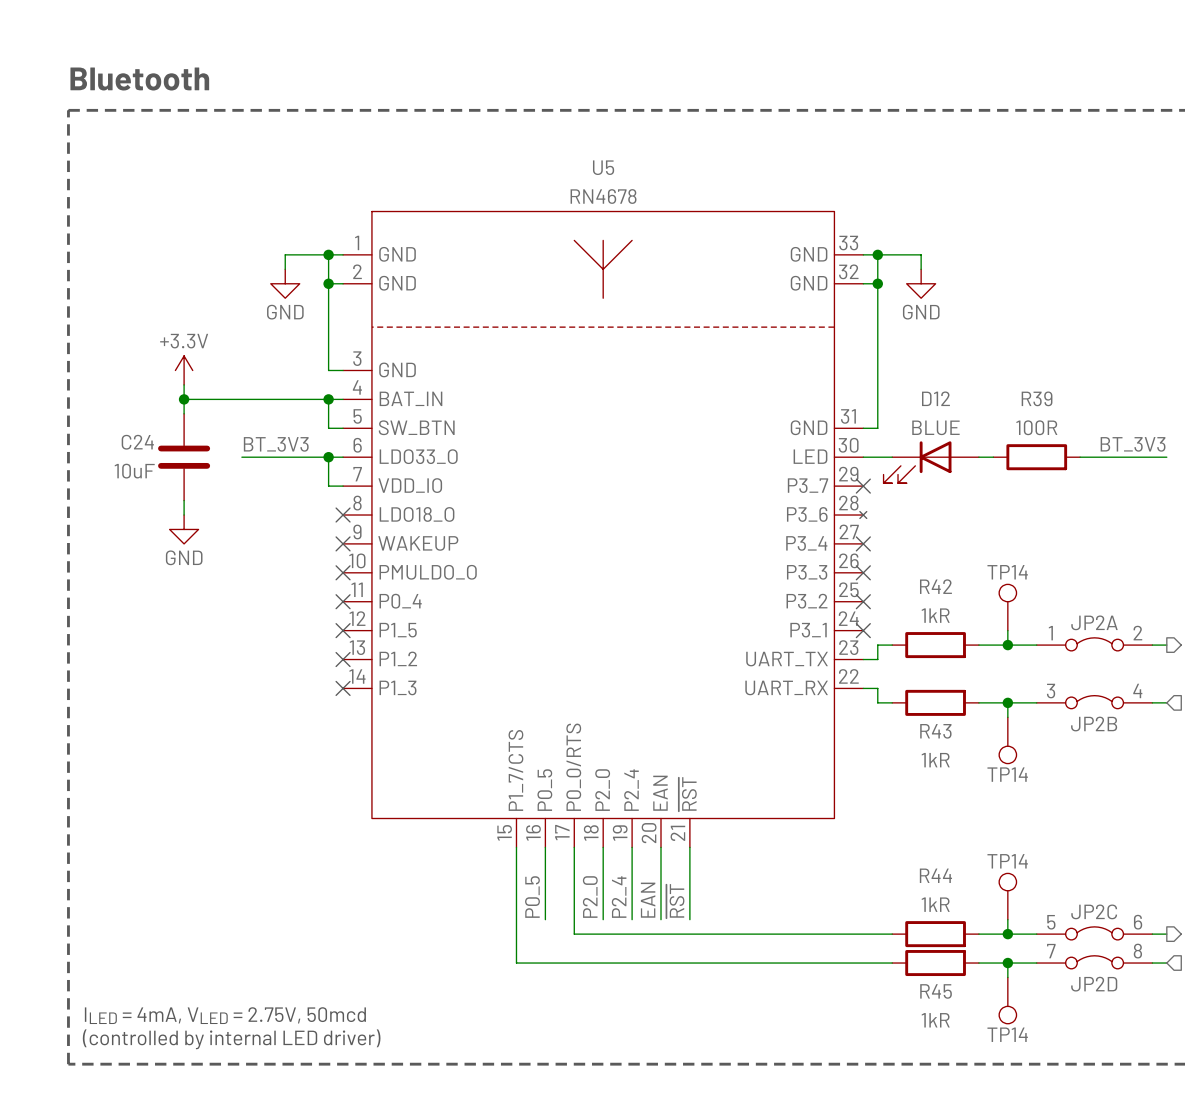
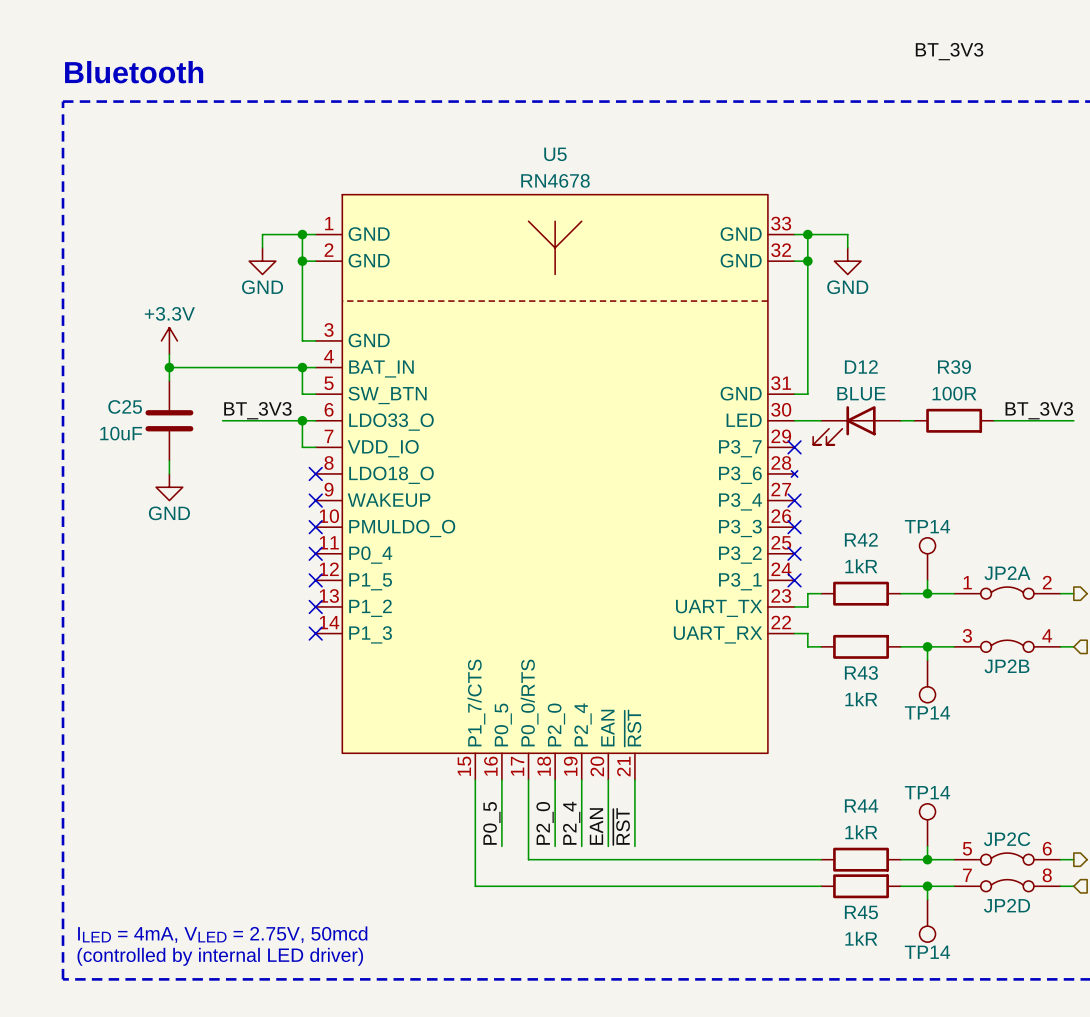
label: none -> BT_3V3 (949, 51)
C24 name: C24 (137, 442) -> C25 (125, 406)

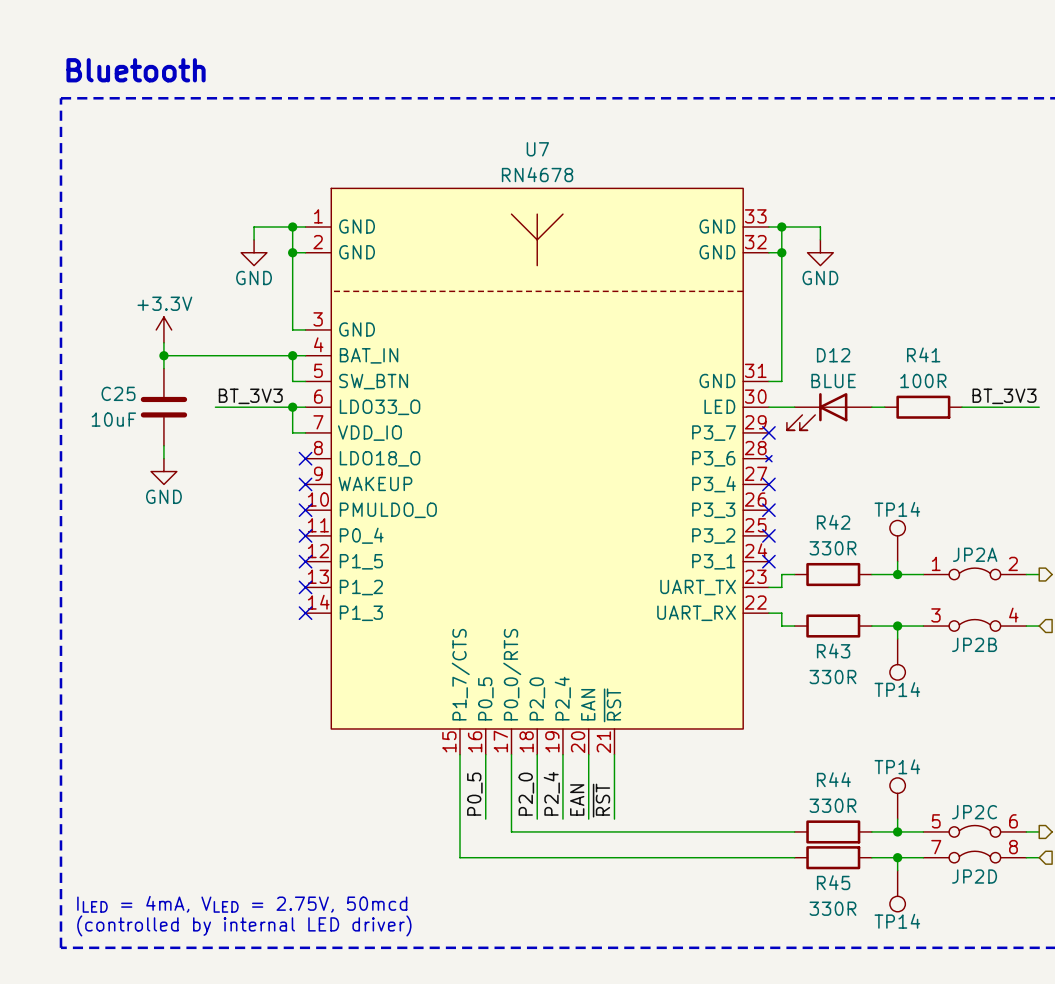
label: BT_3V3 (949, 51) -> none
U5 name: U5 (555, 154) -> U7 (537, 149)
R39 name: R39 (954, 367) -> R41 (923, 354)
R42 value: 1kR (861, 566) -> 330R (832, 548)
R43 value: 1kR (861, 699) -> 330R (832, 677)
R44 value: 1kR (861, 832) -> 330R (832, 805)
R45 value: 1kR (861, 938) -> 330R (832, 908)

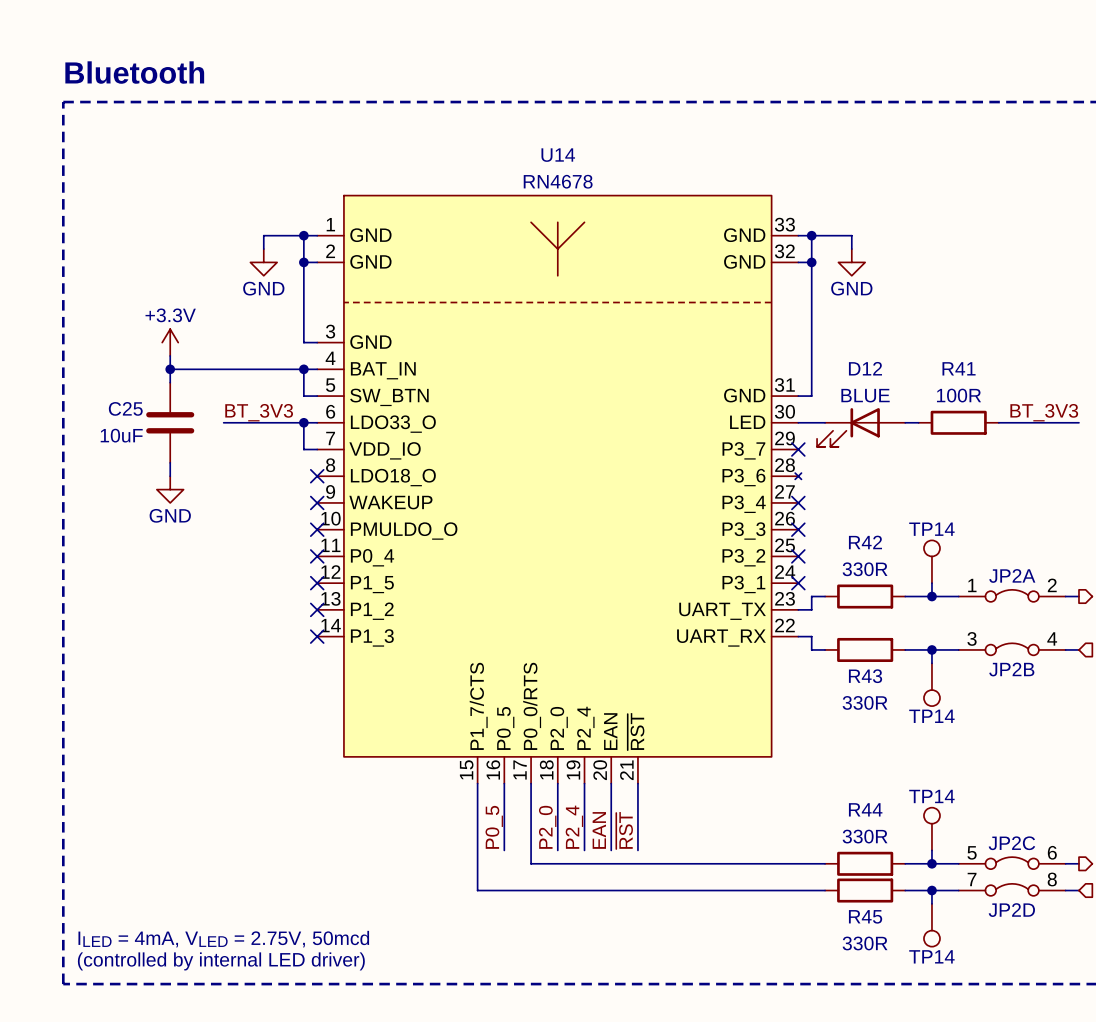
U7 name: U7 (537, 149) -> U14 (558, 155)

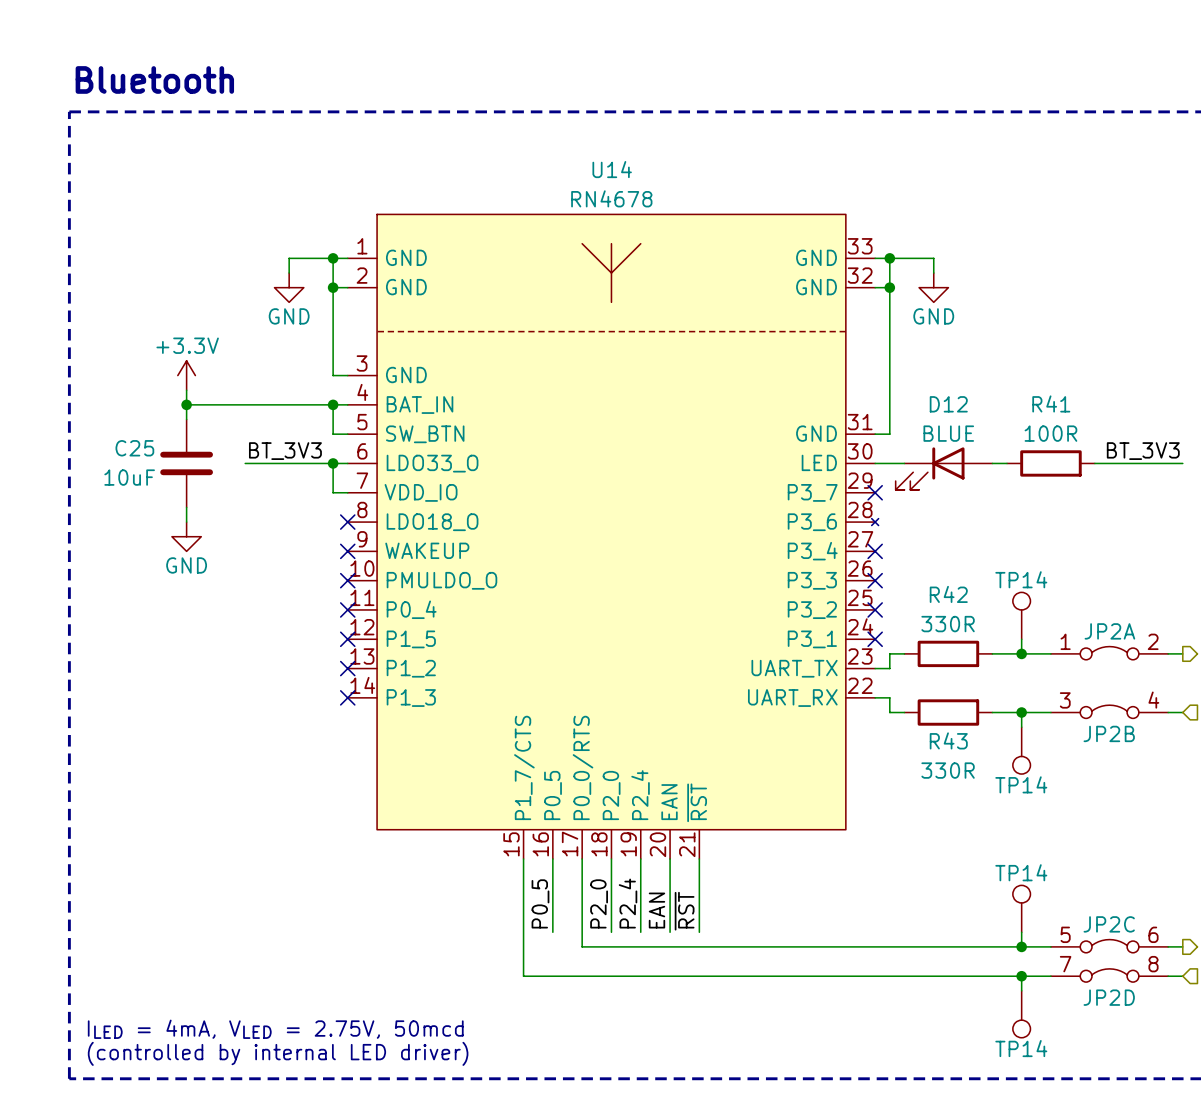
wire: none -> (904, 946) (992, 946)
R44: 330R (865, 863) -> none
wire: none -> (904, 976) (992, 976)
R45: 330R (865, 890) -> none

